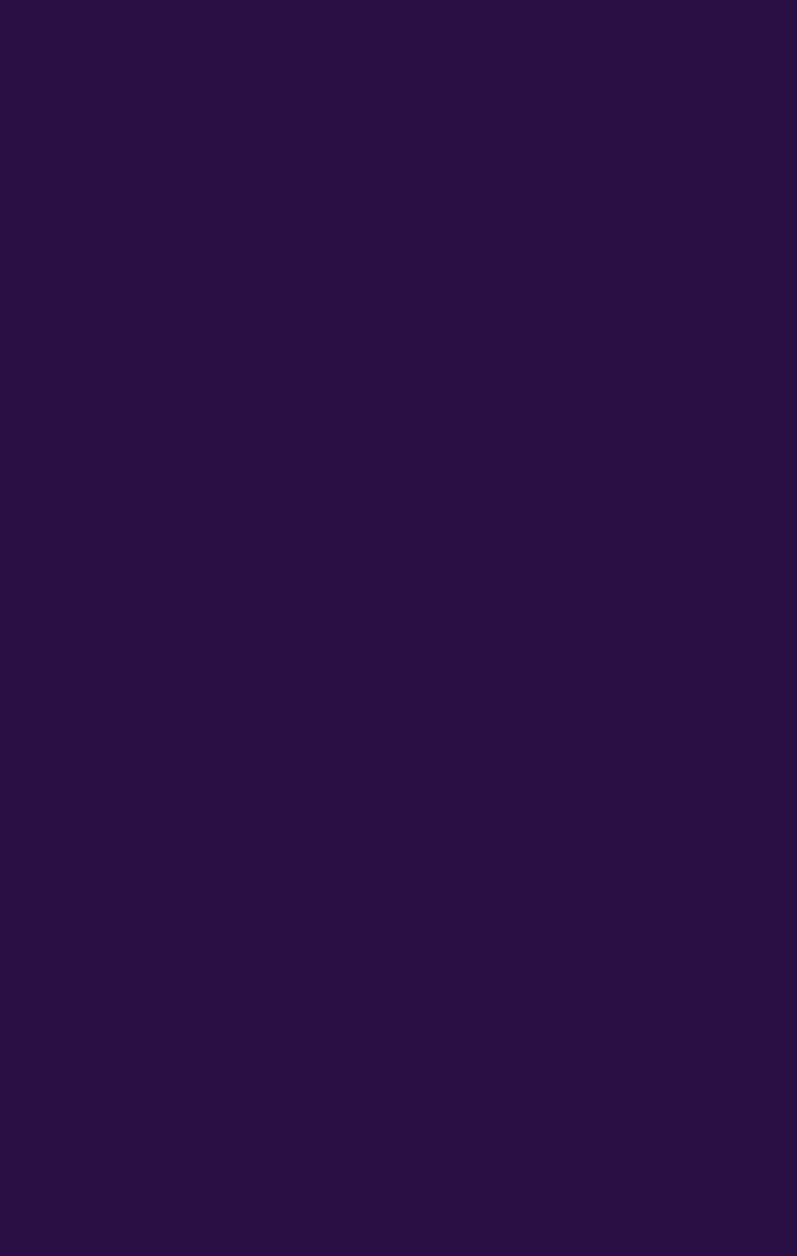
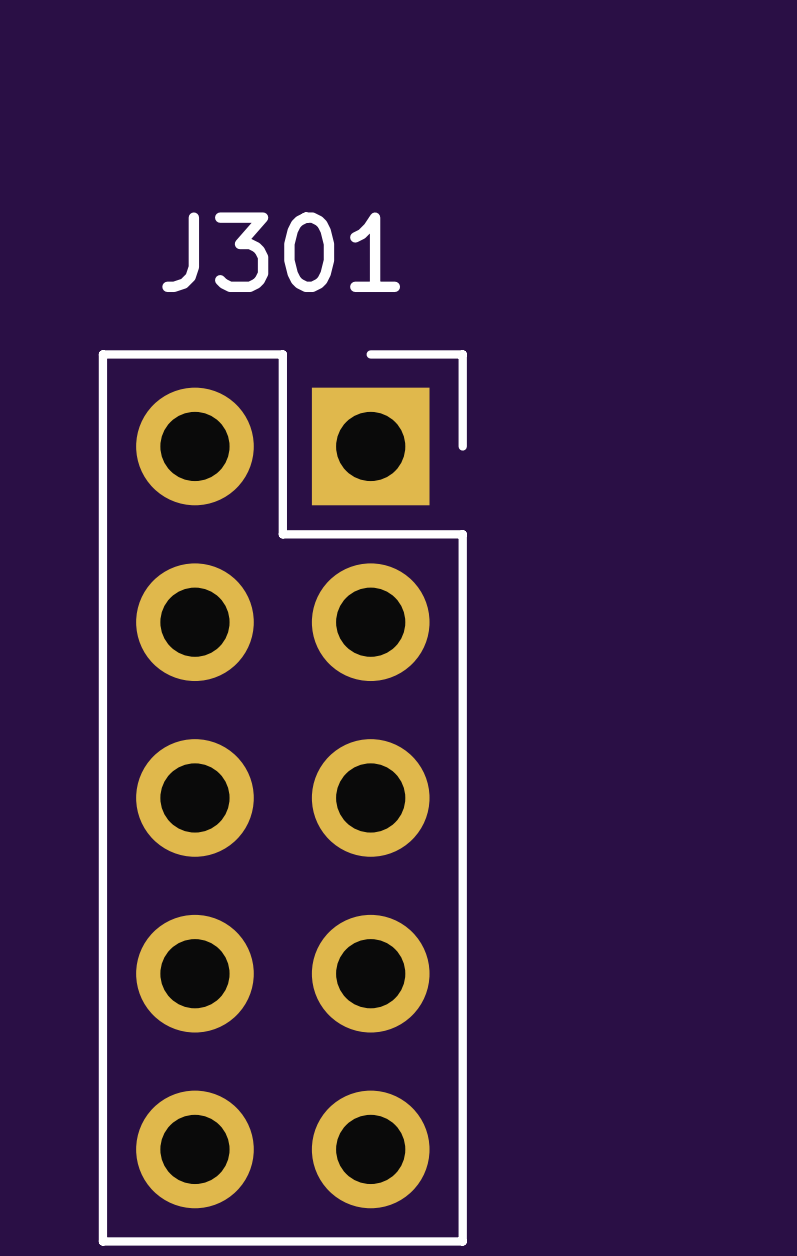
J301: none -> (282, 797)

